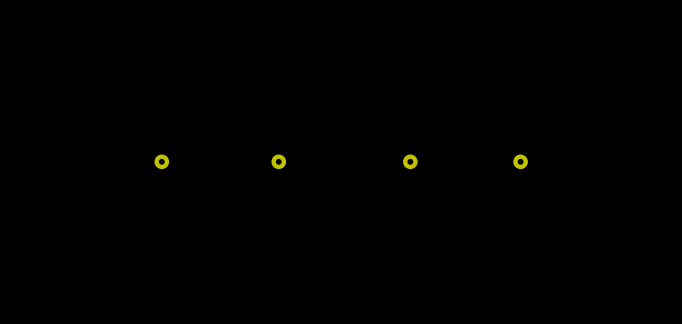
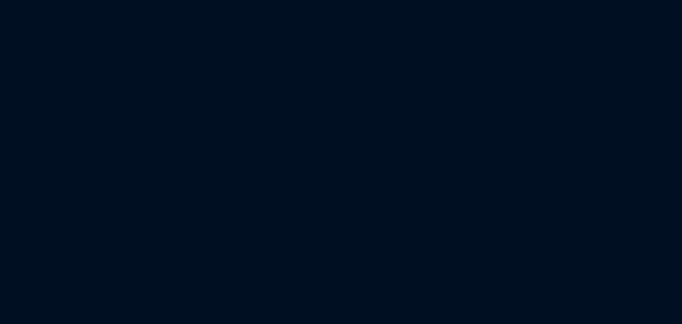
part: (161, 161) -> none
part: (278, 161) -> none
part: (410, 161) -> none
part: (520, 161) -> none

